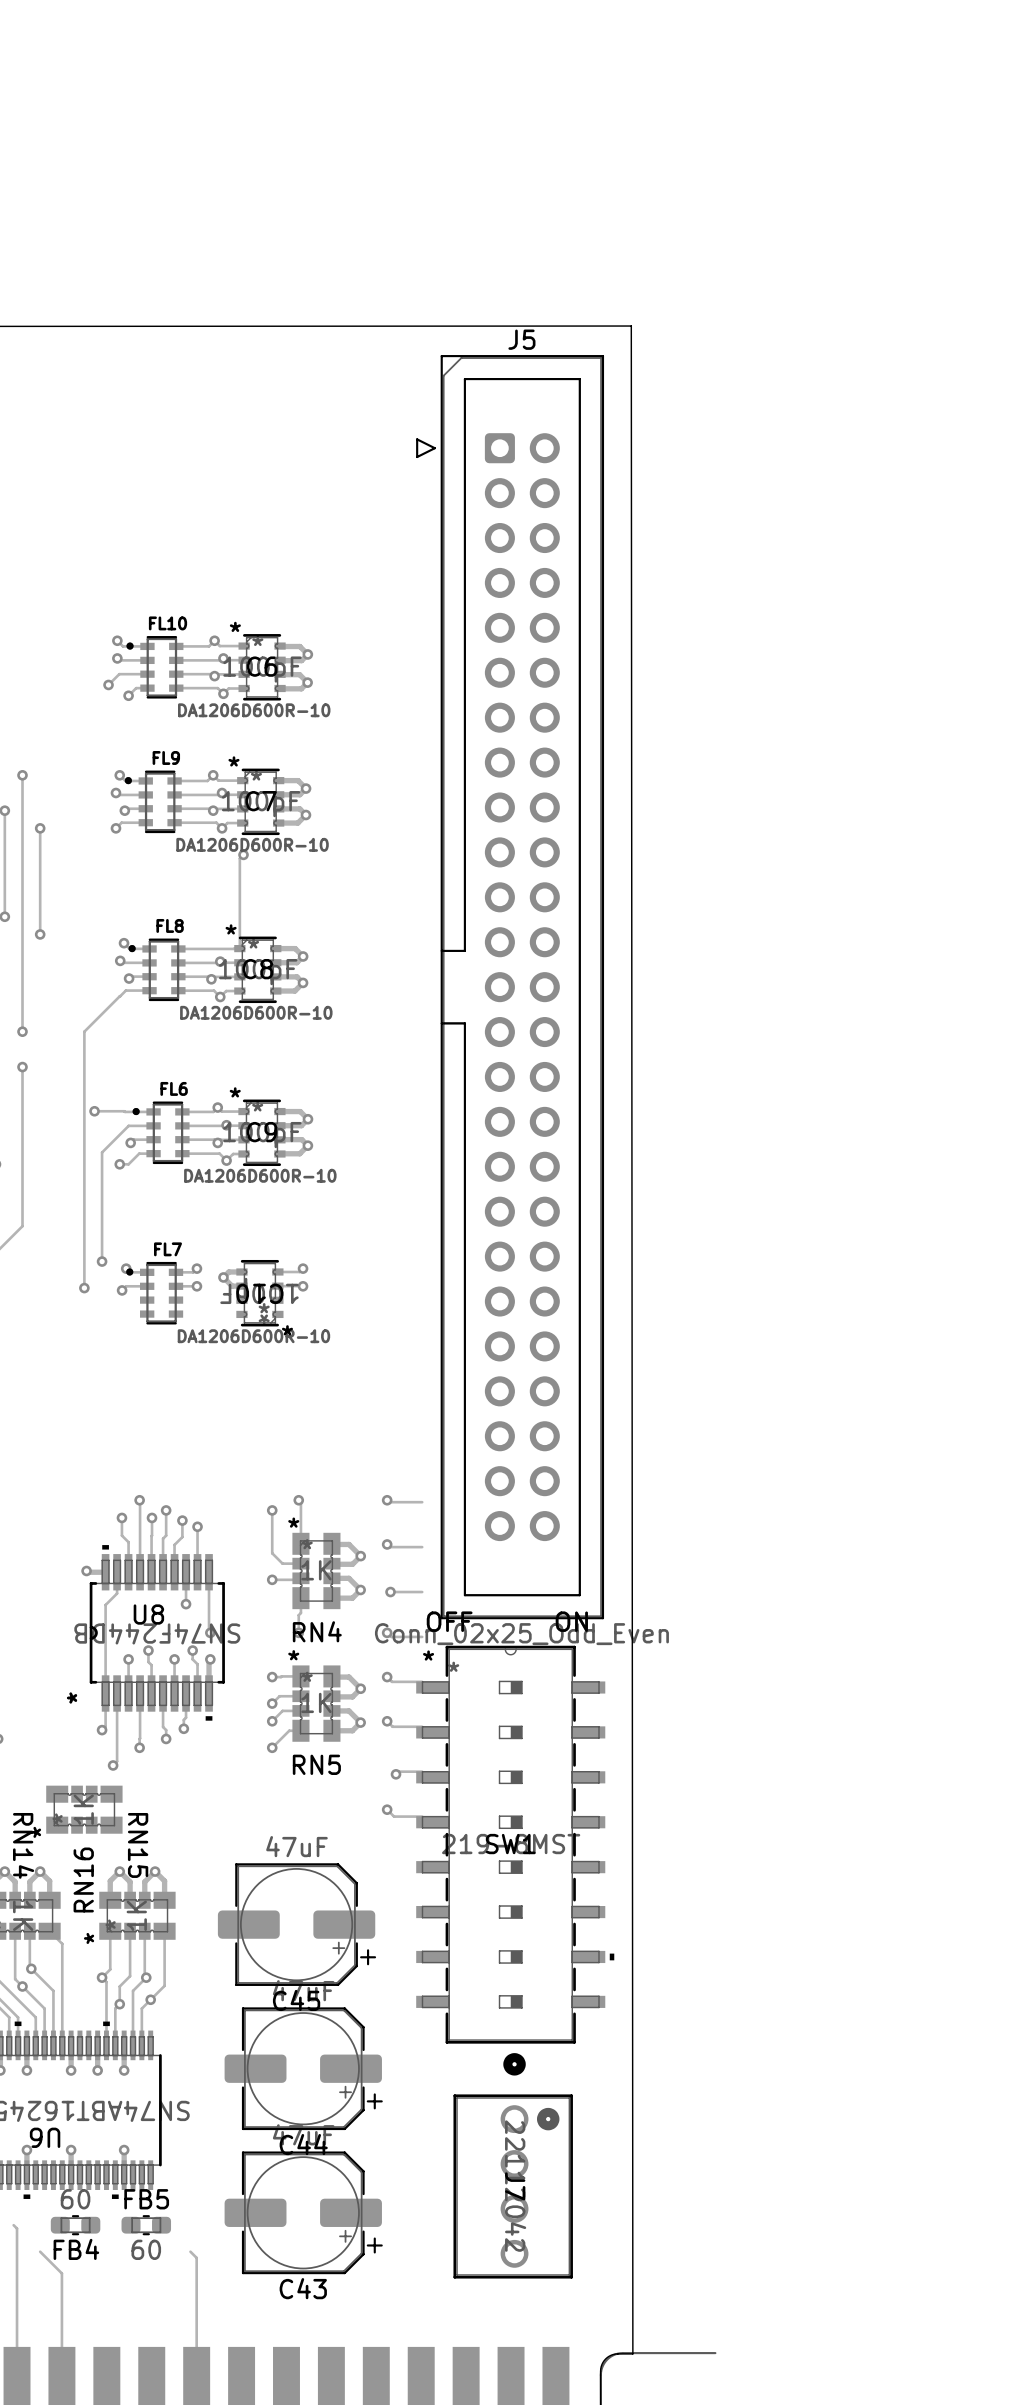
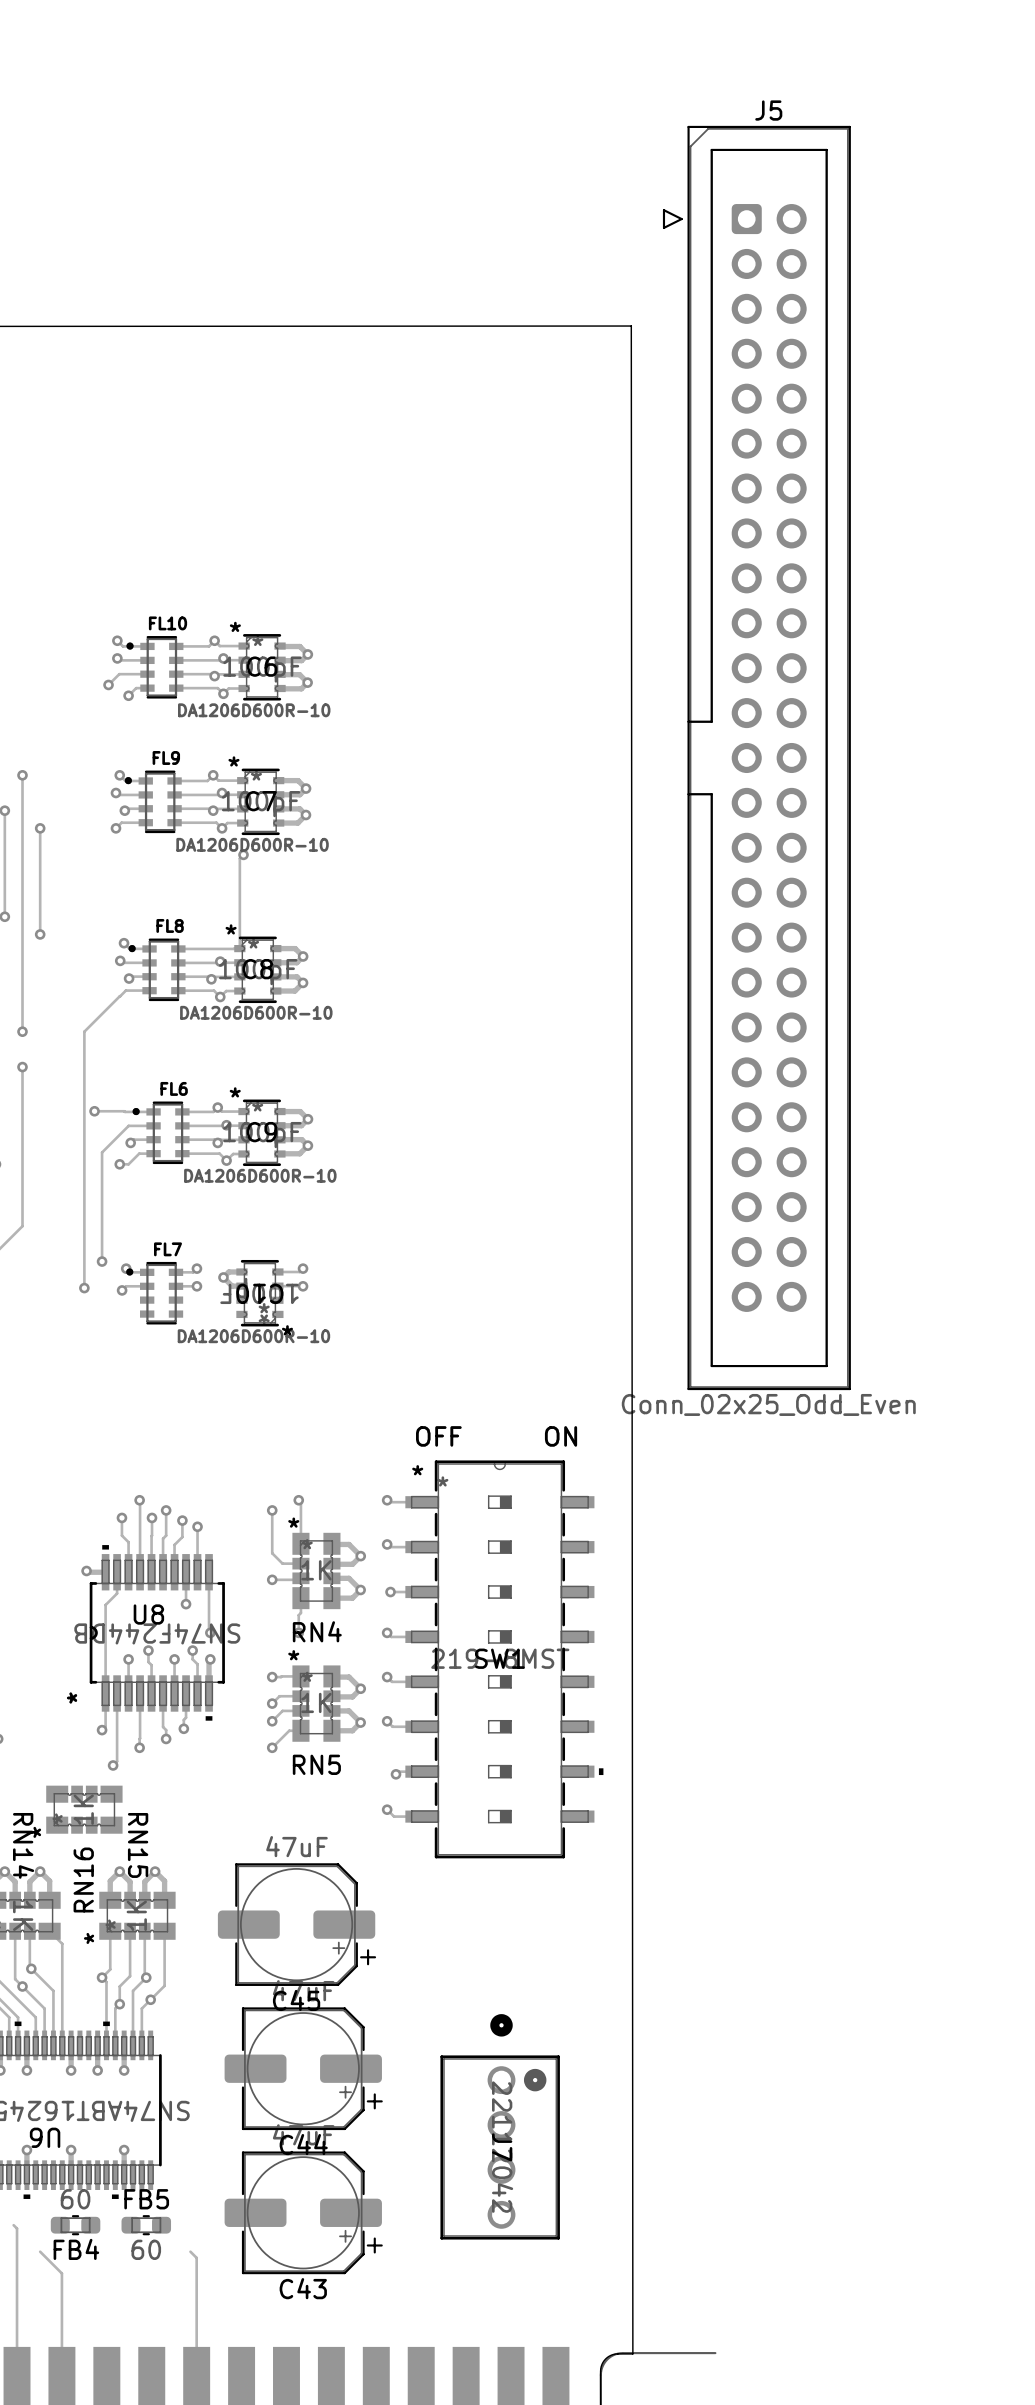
J5 position: (510, 987) -> (756, 757)
SW1 position: (515, 1844) -> (504, 1659)
J7 position: (513, 2165) -> (500, 2126)

